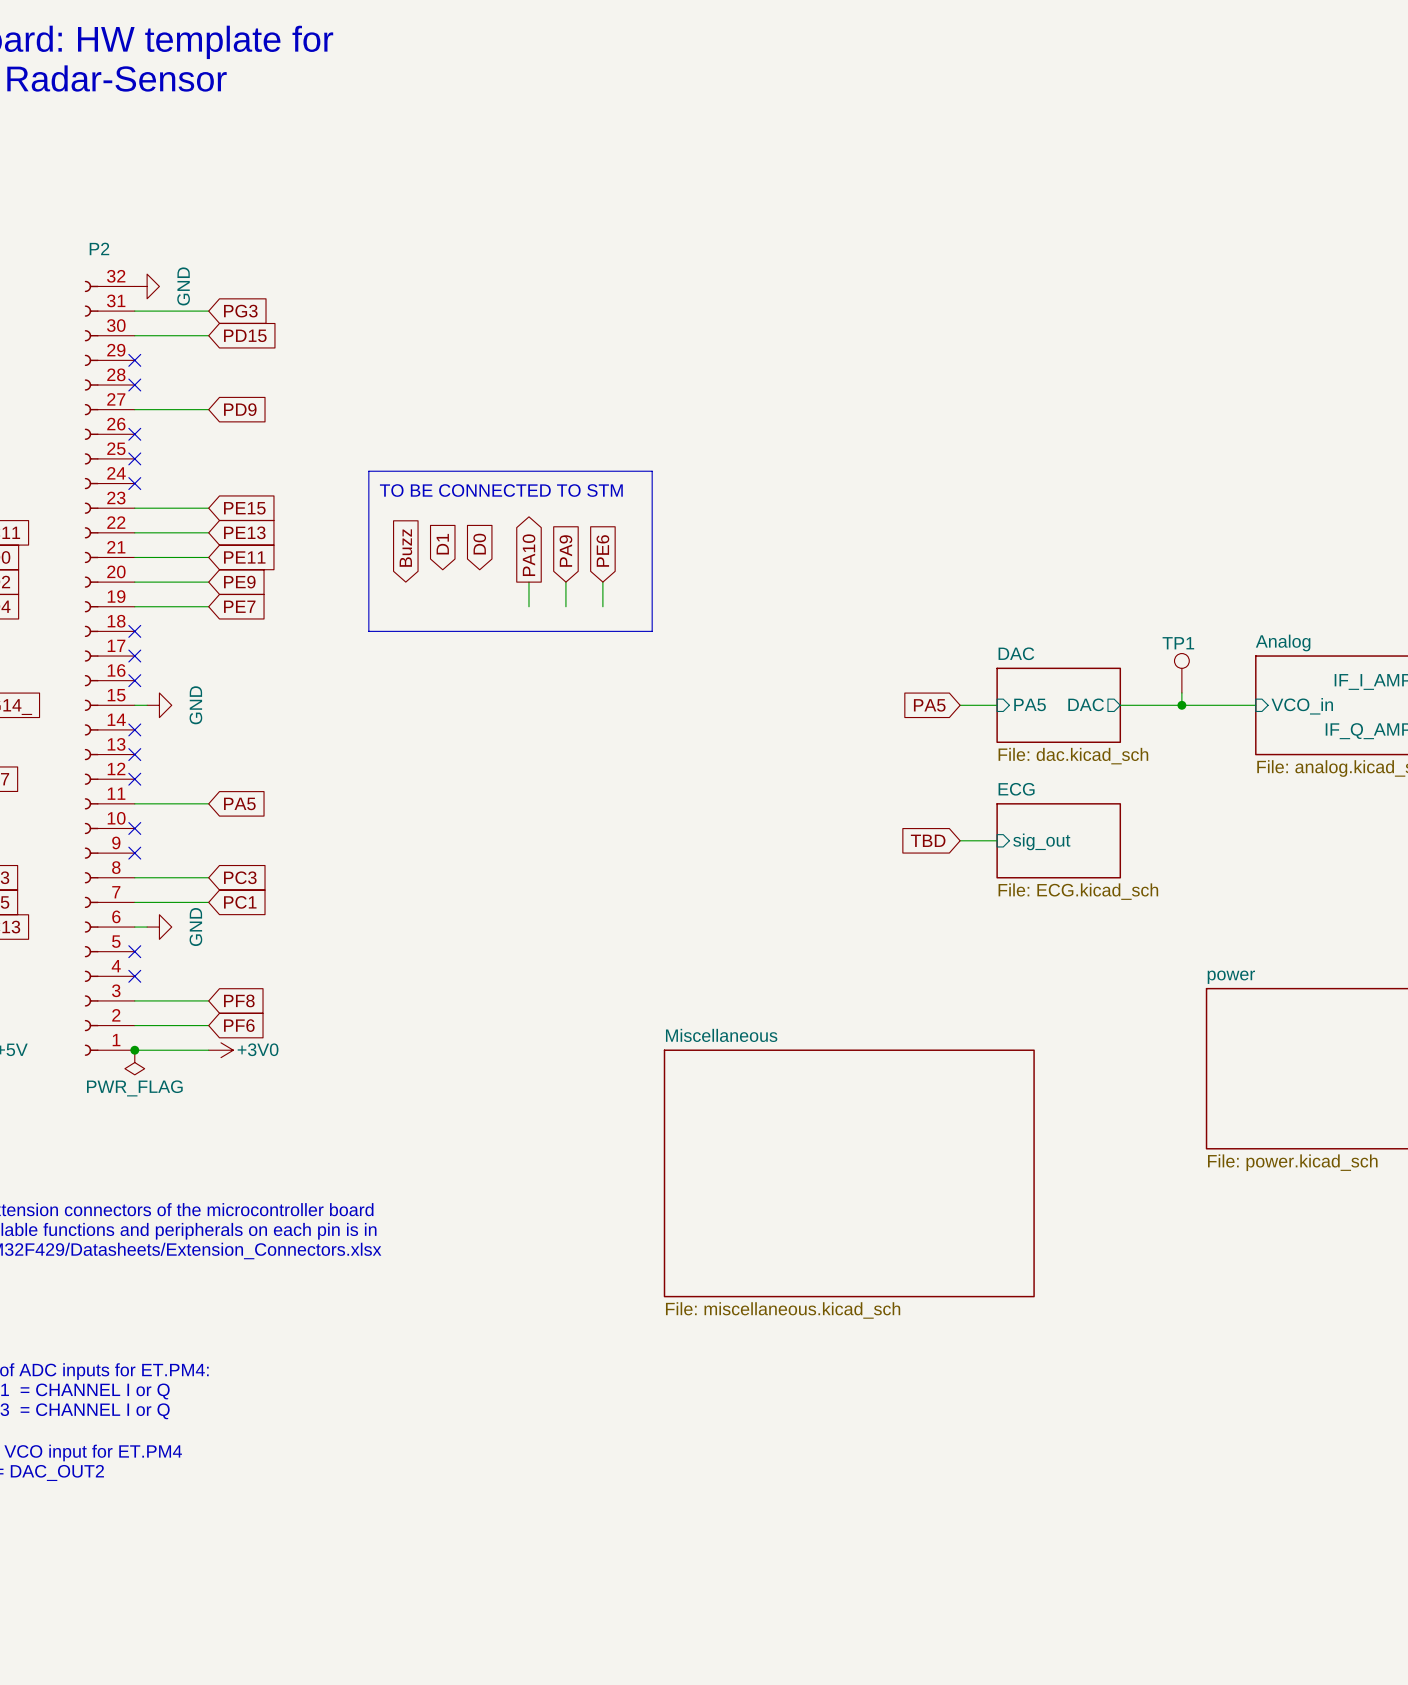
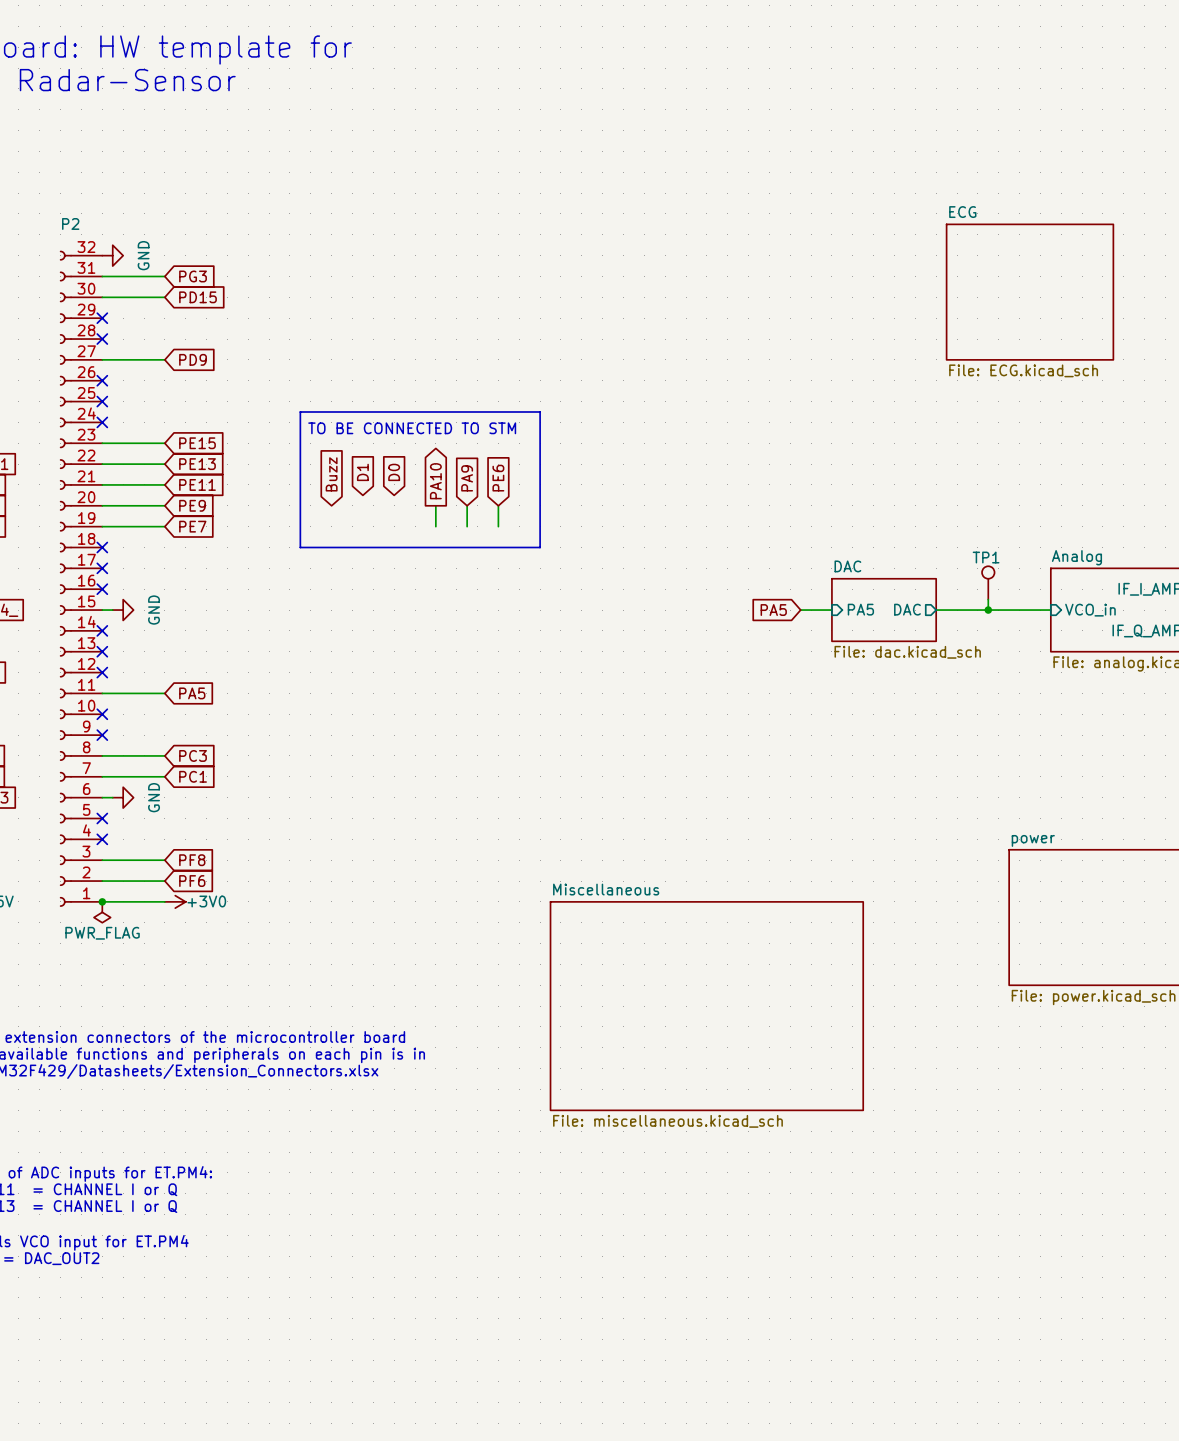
sheet ECG: none -> File: ECG.kicad_sch (1029, 292)
global label: TBD (928, 840) -> none
wire: (960, 840) (997, 840) -> none
sheet ECG: File: ECG.kicad_sch (1058, 840) -> none
sheet pin: sig_out (1041, 841) -> none

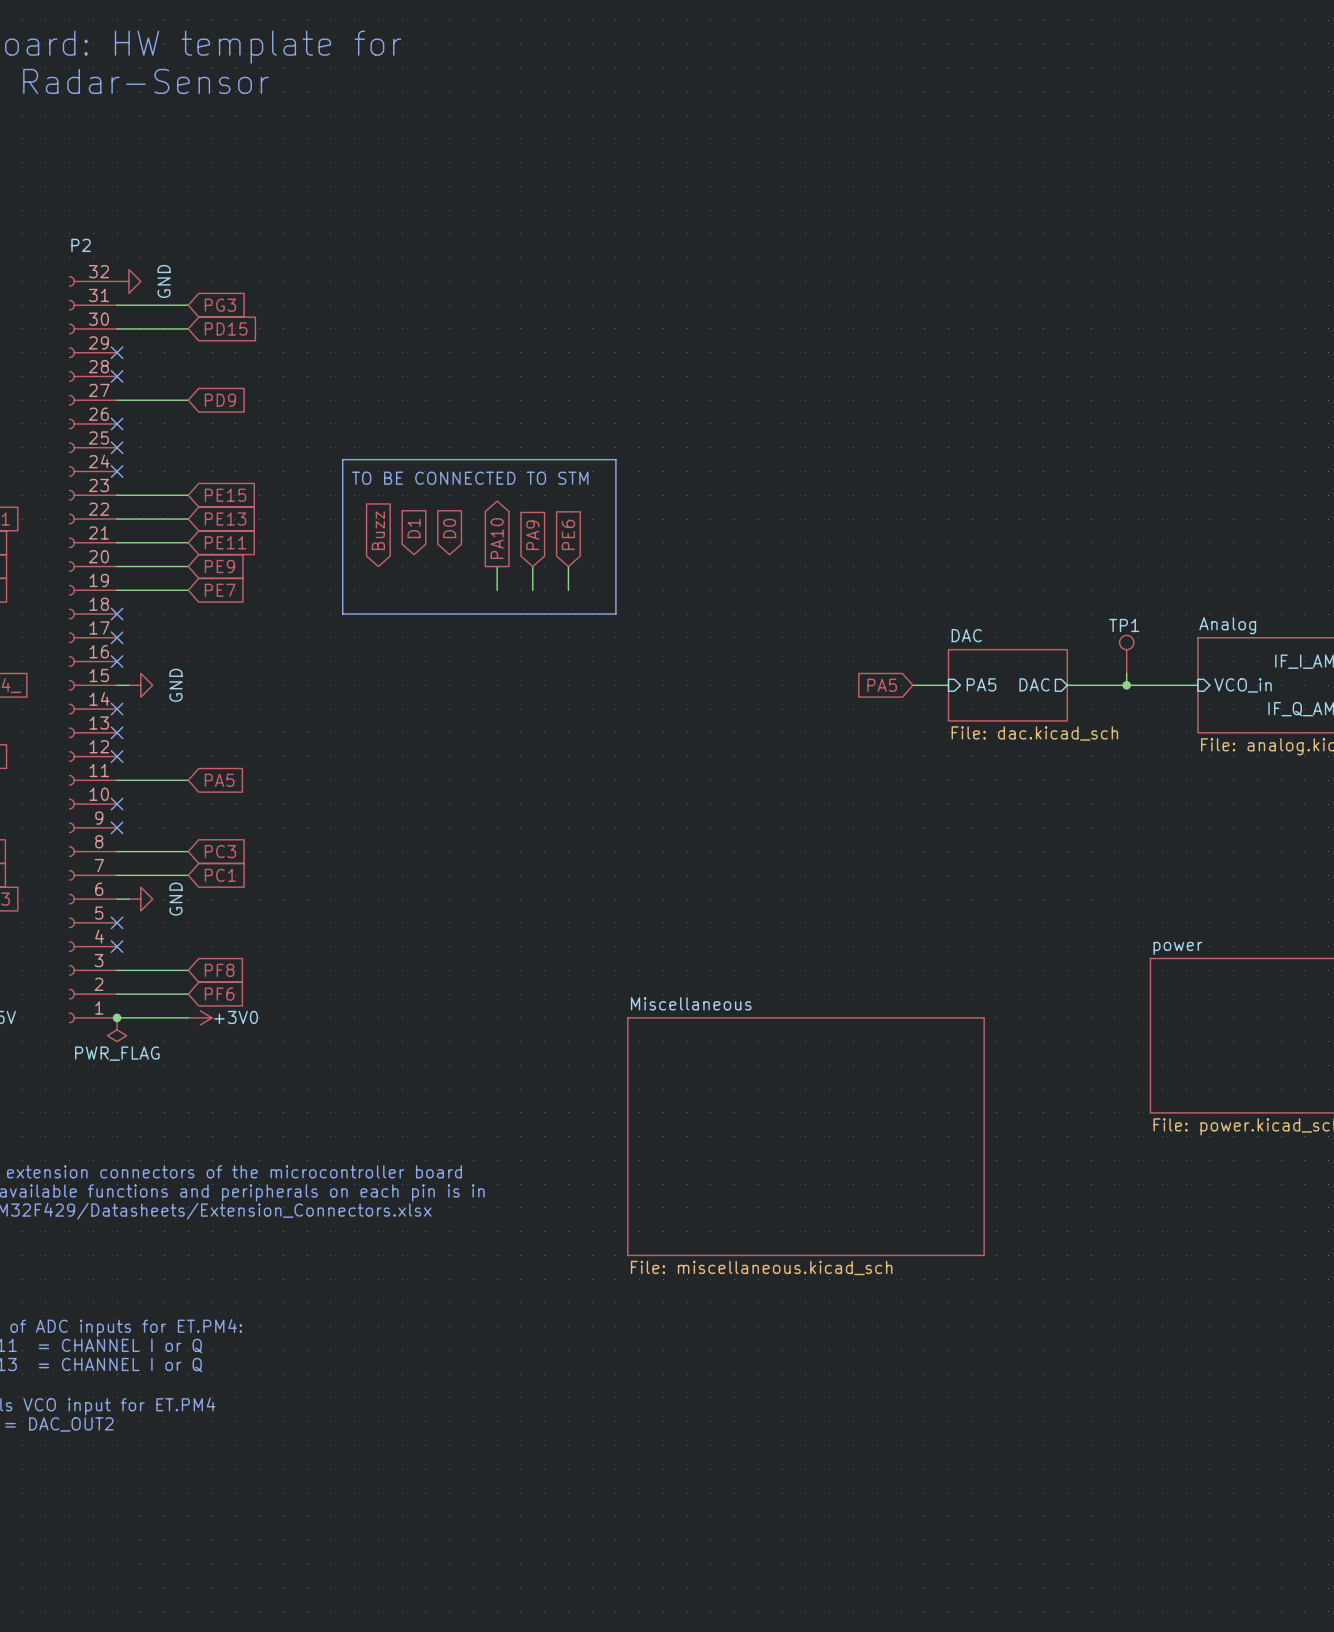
sheet ECG: File: ECG.kicad_sch (1029, 292) -> none

